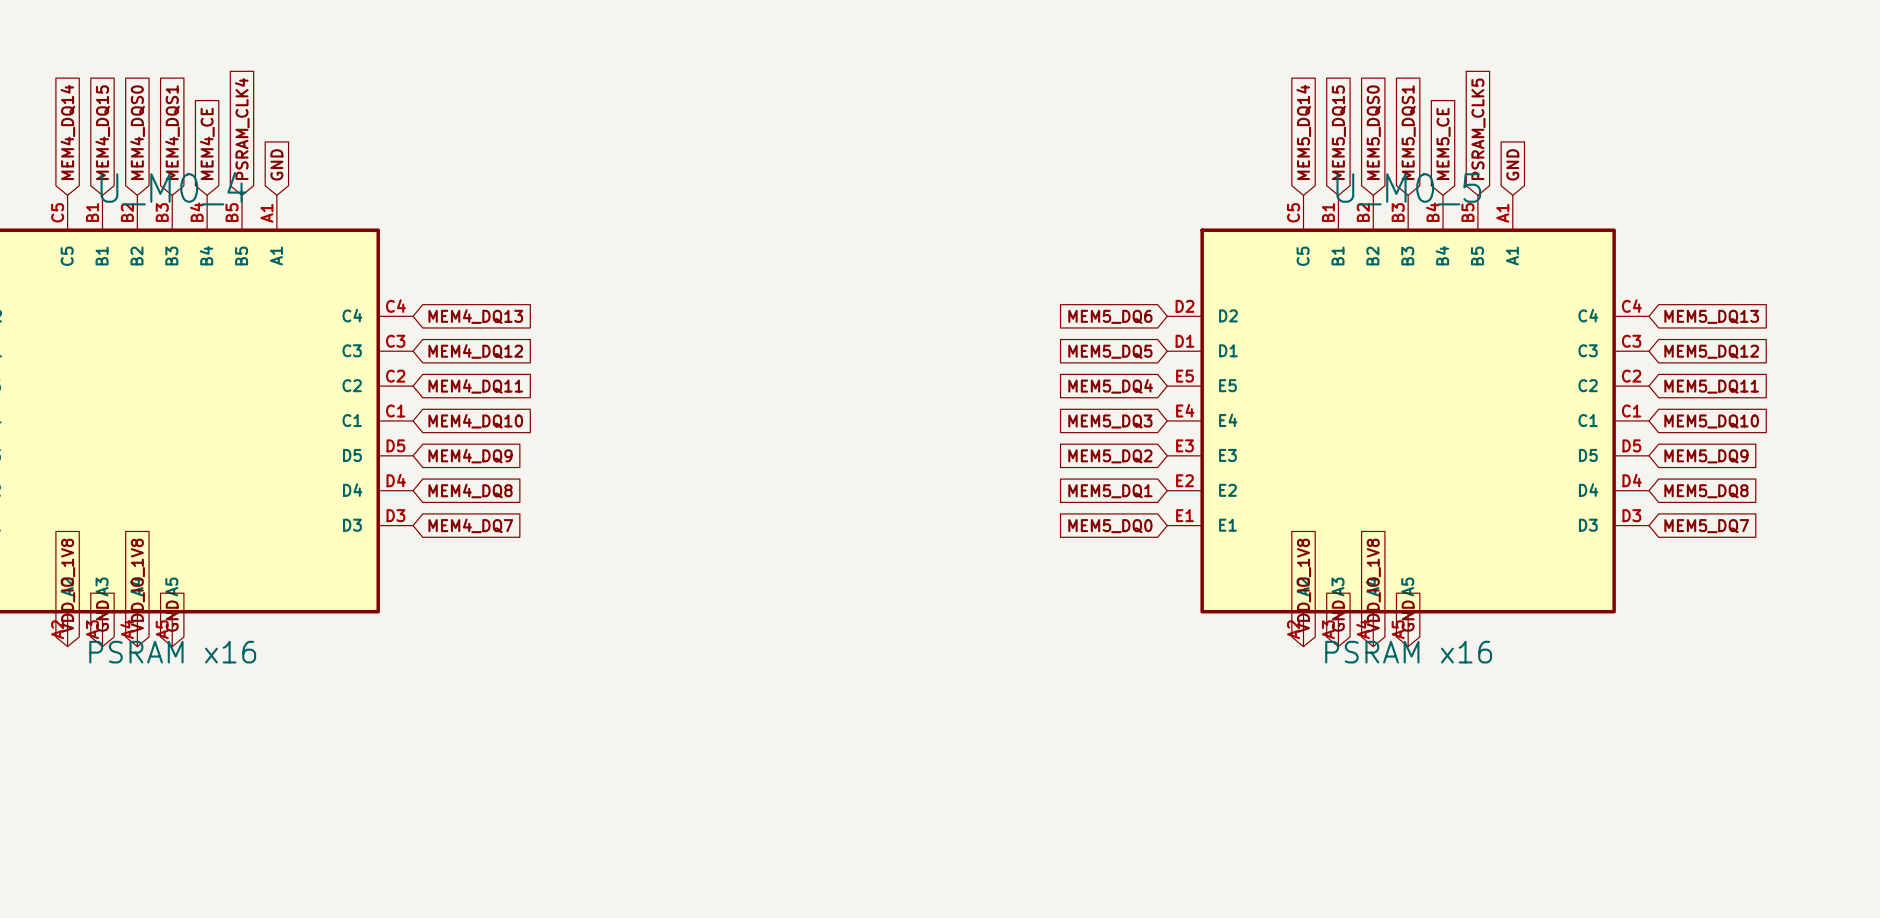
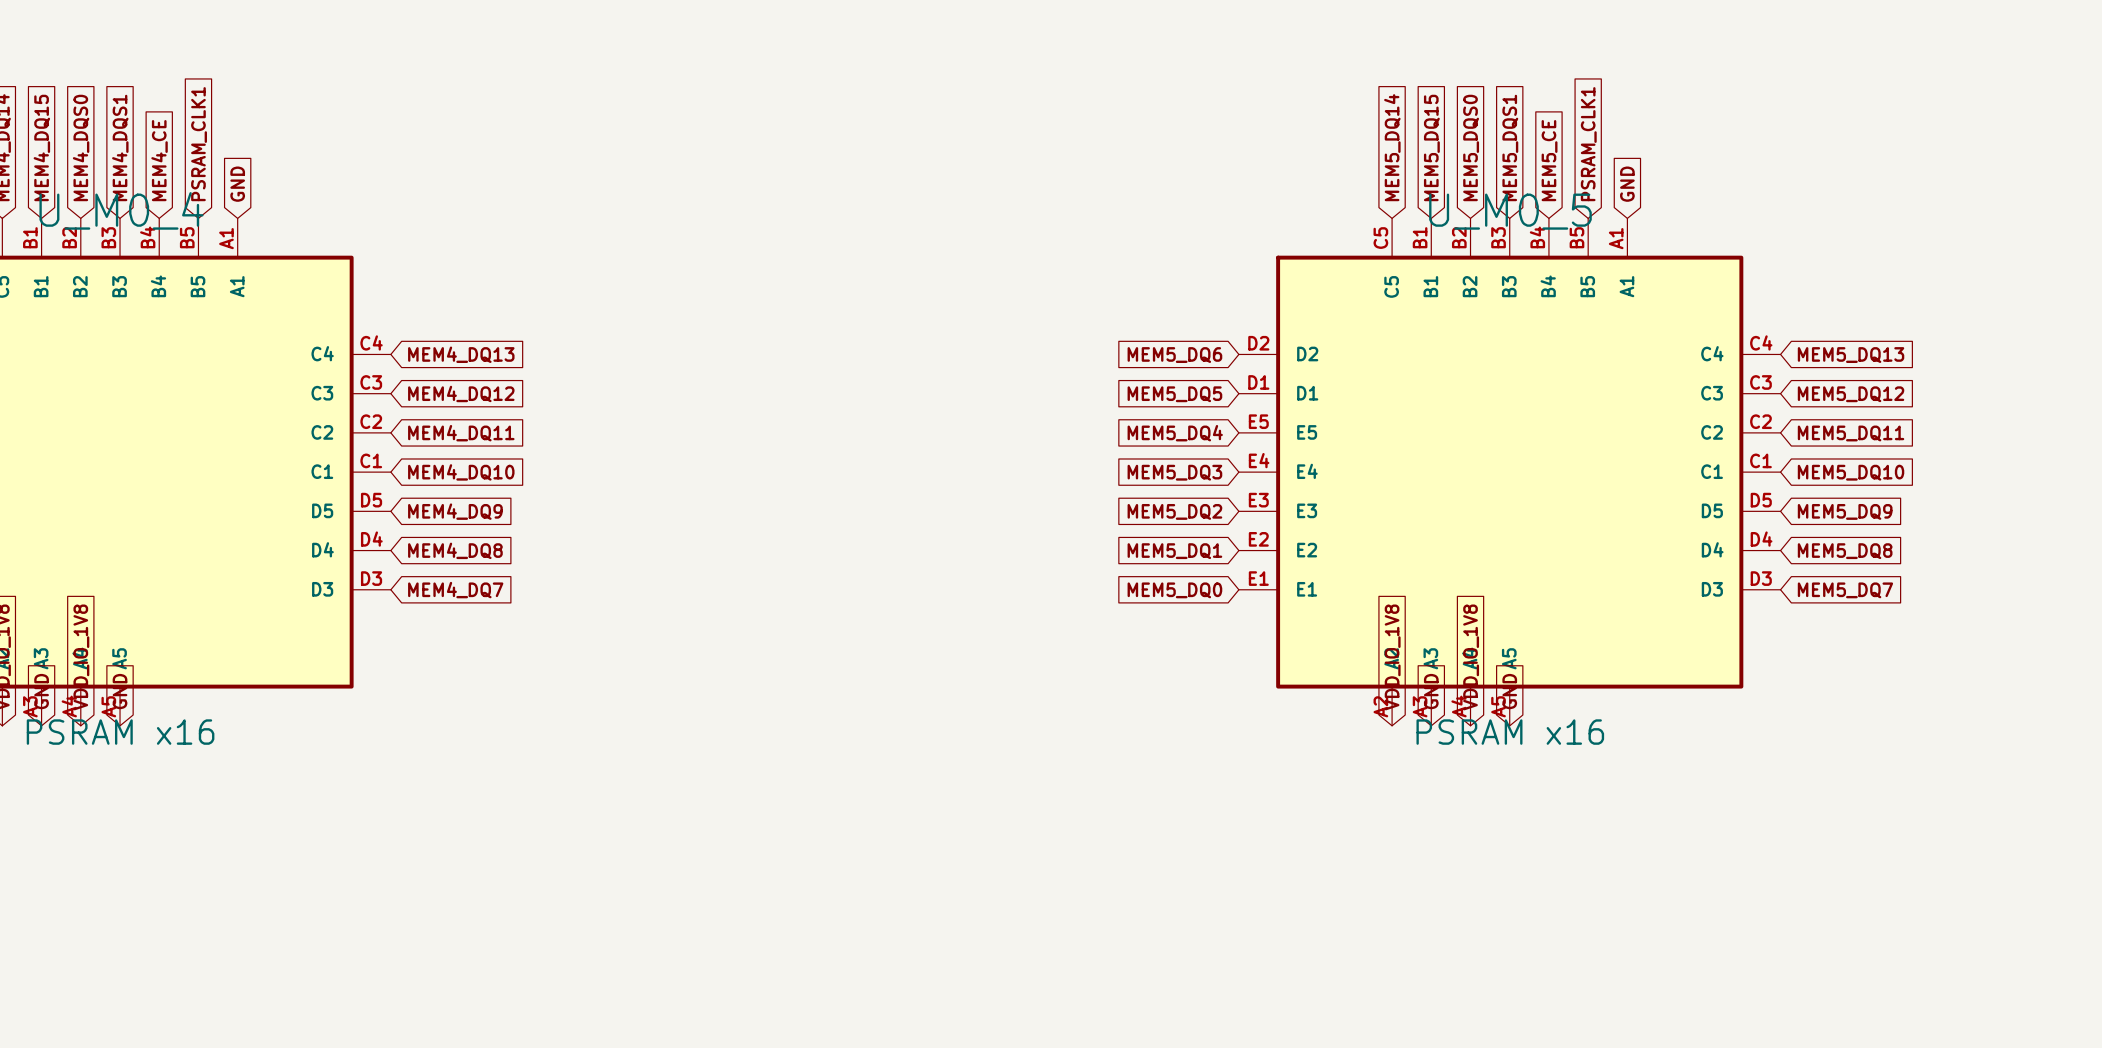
global label: PSRAM_CLK4 (242, 129) -> PSRAM_CLK1 (199, 144)
global label: PSRAM_CLK5 (1478, 129) -> PSRAM_CLK1 (1588, 144)

